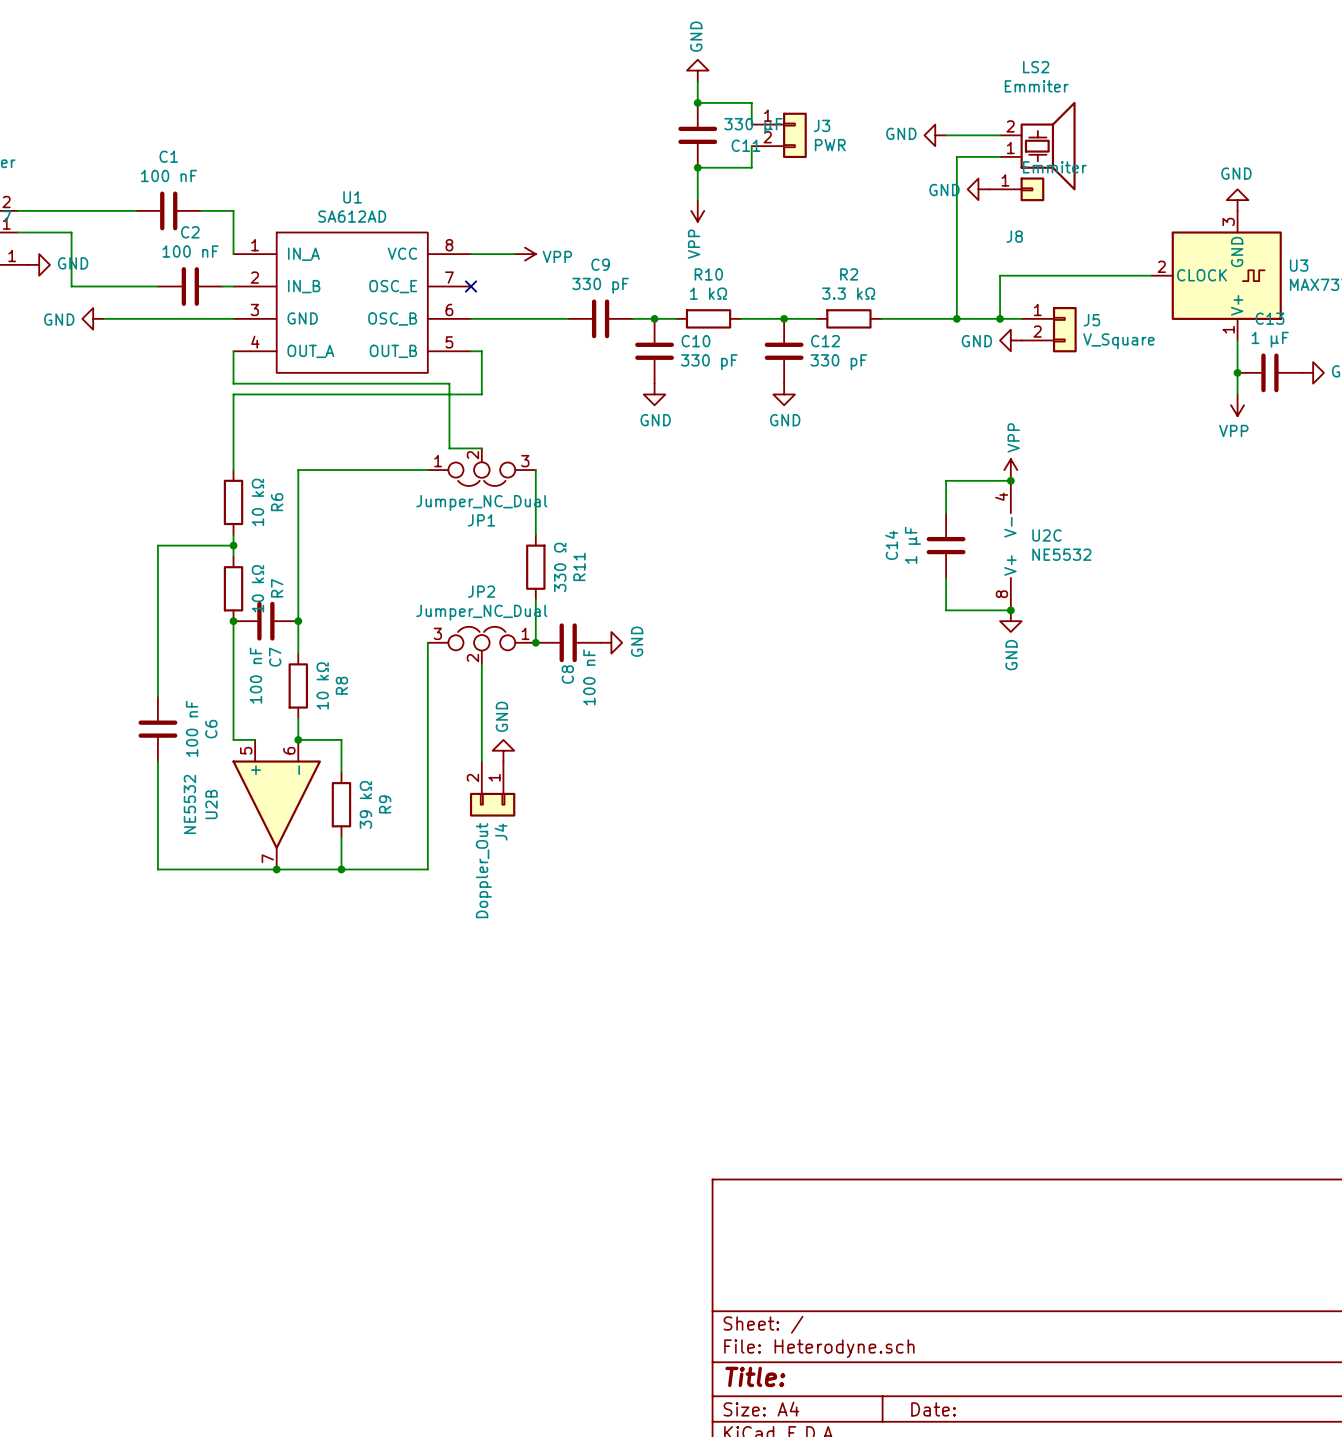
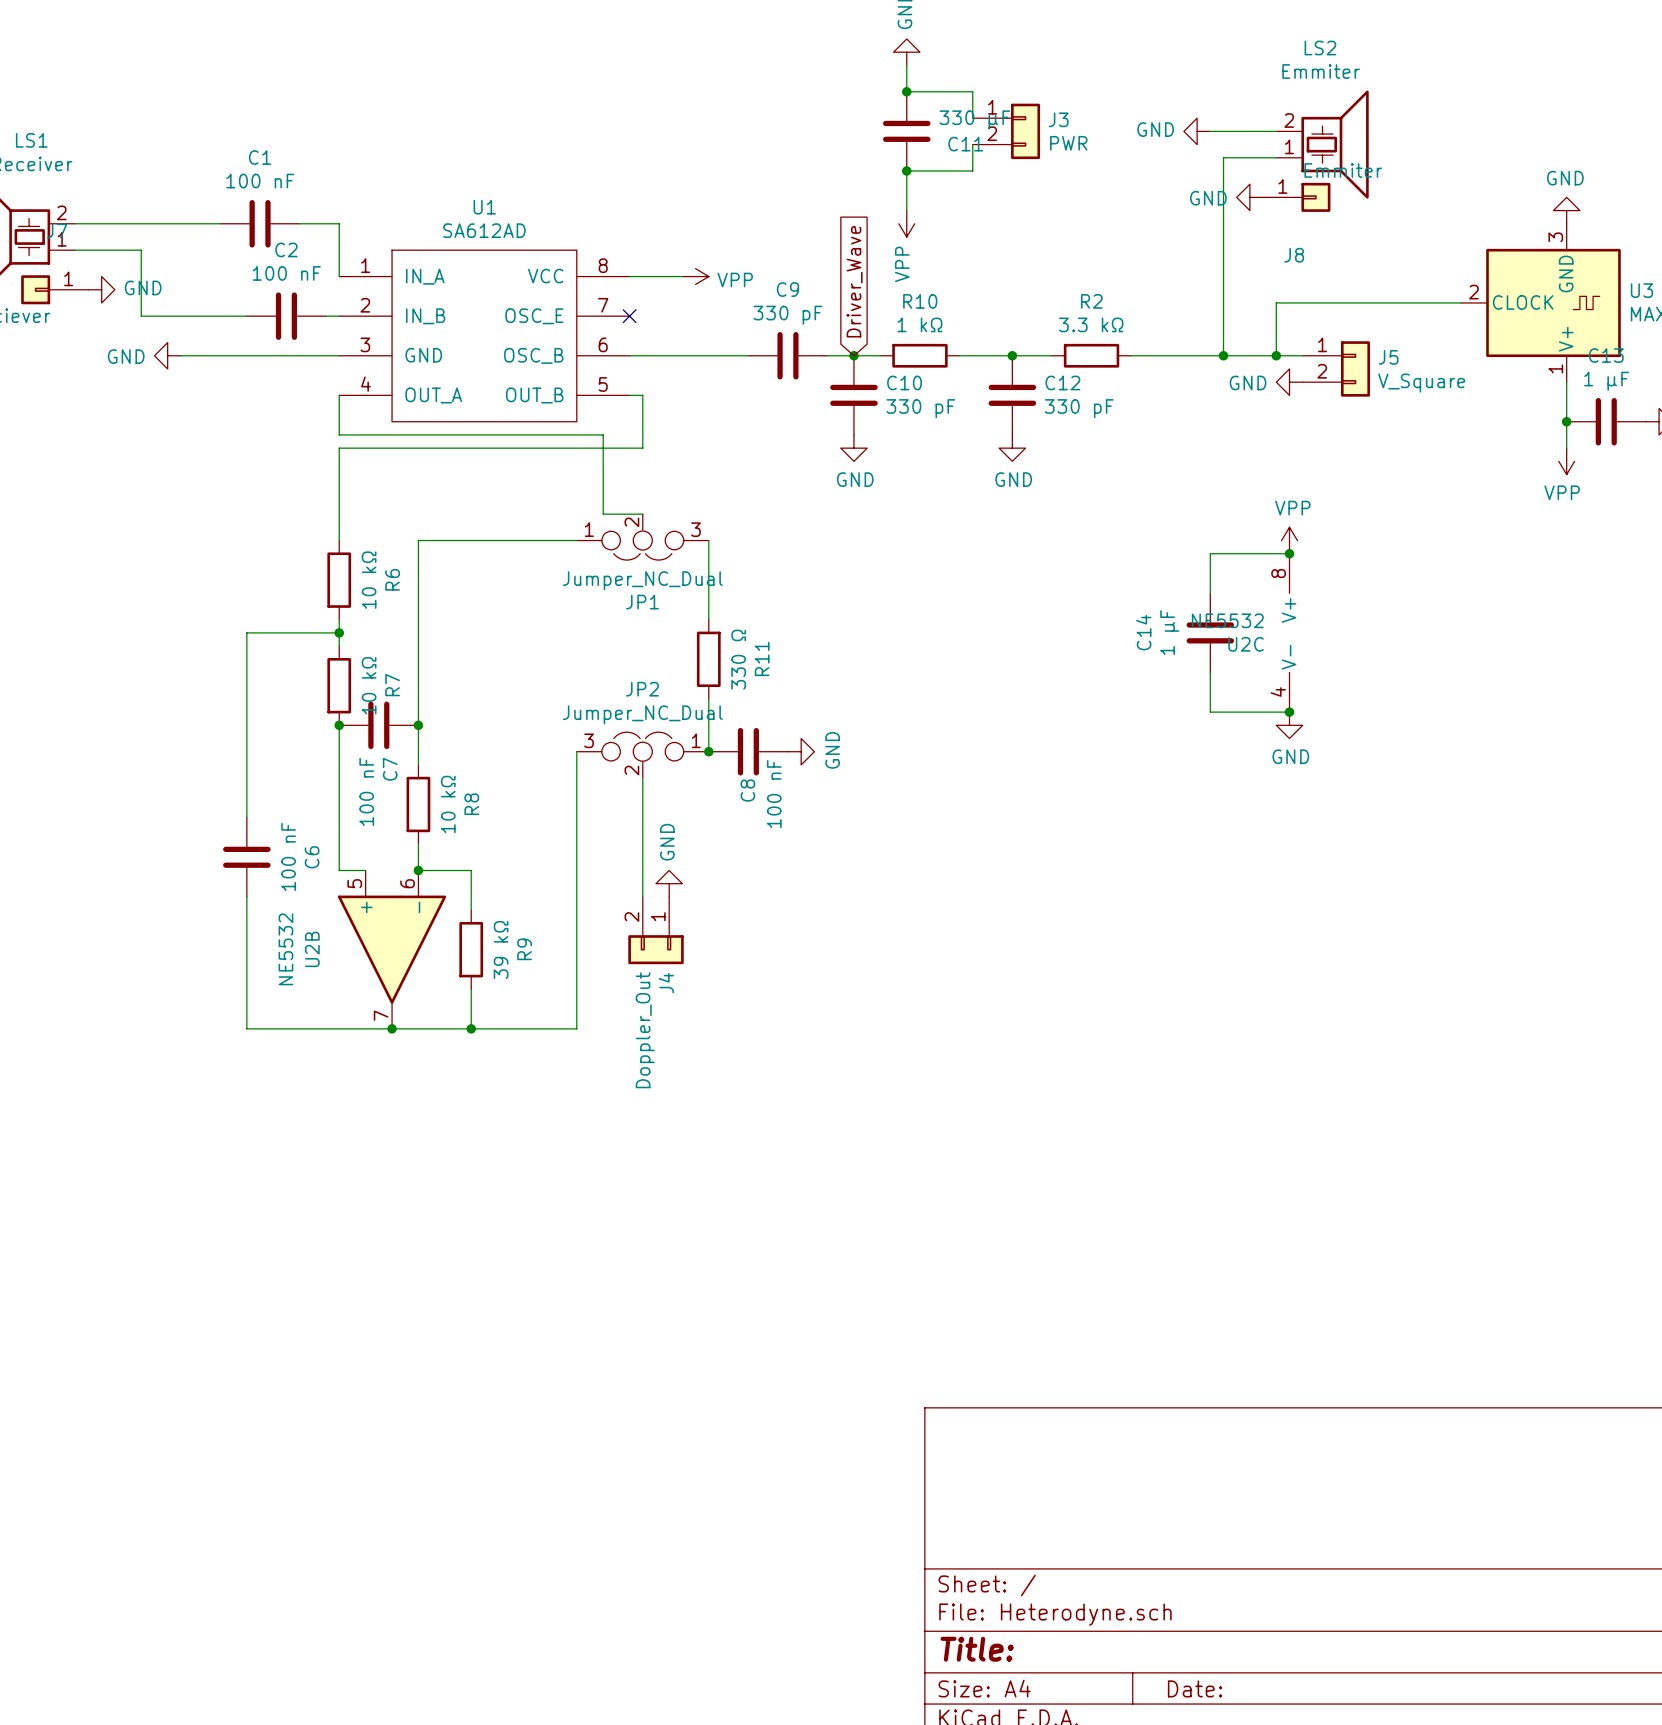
global label: none -> Driver_Wave (854, 281)
power symbol text rotation: 0° (1013, 437) -> 90° clockwise (1292, 508)
U2C rotation: 0° (1010, 545) -> 180° (1289, 632)
power symbol text rotation: 0° (1011, 655) -> 90° clockwise (1290, 756)

